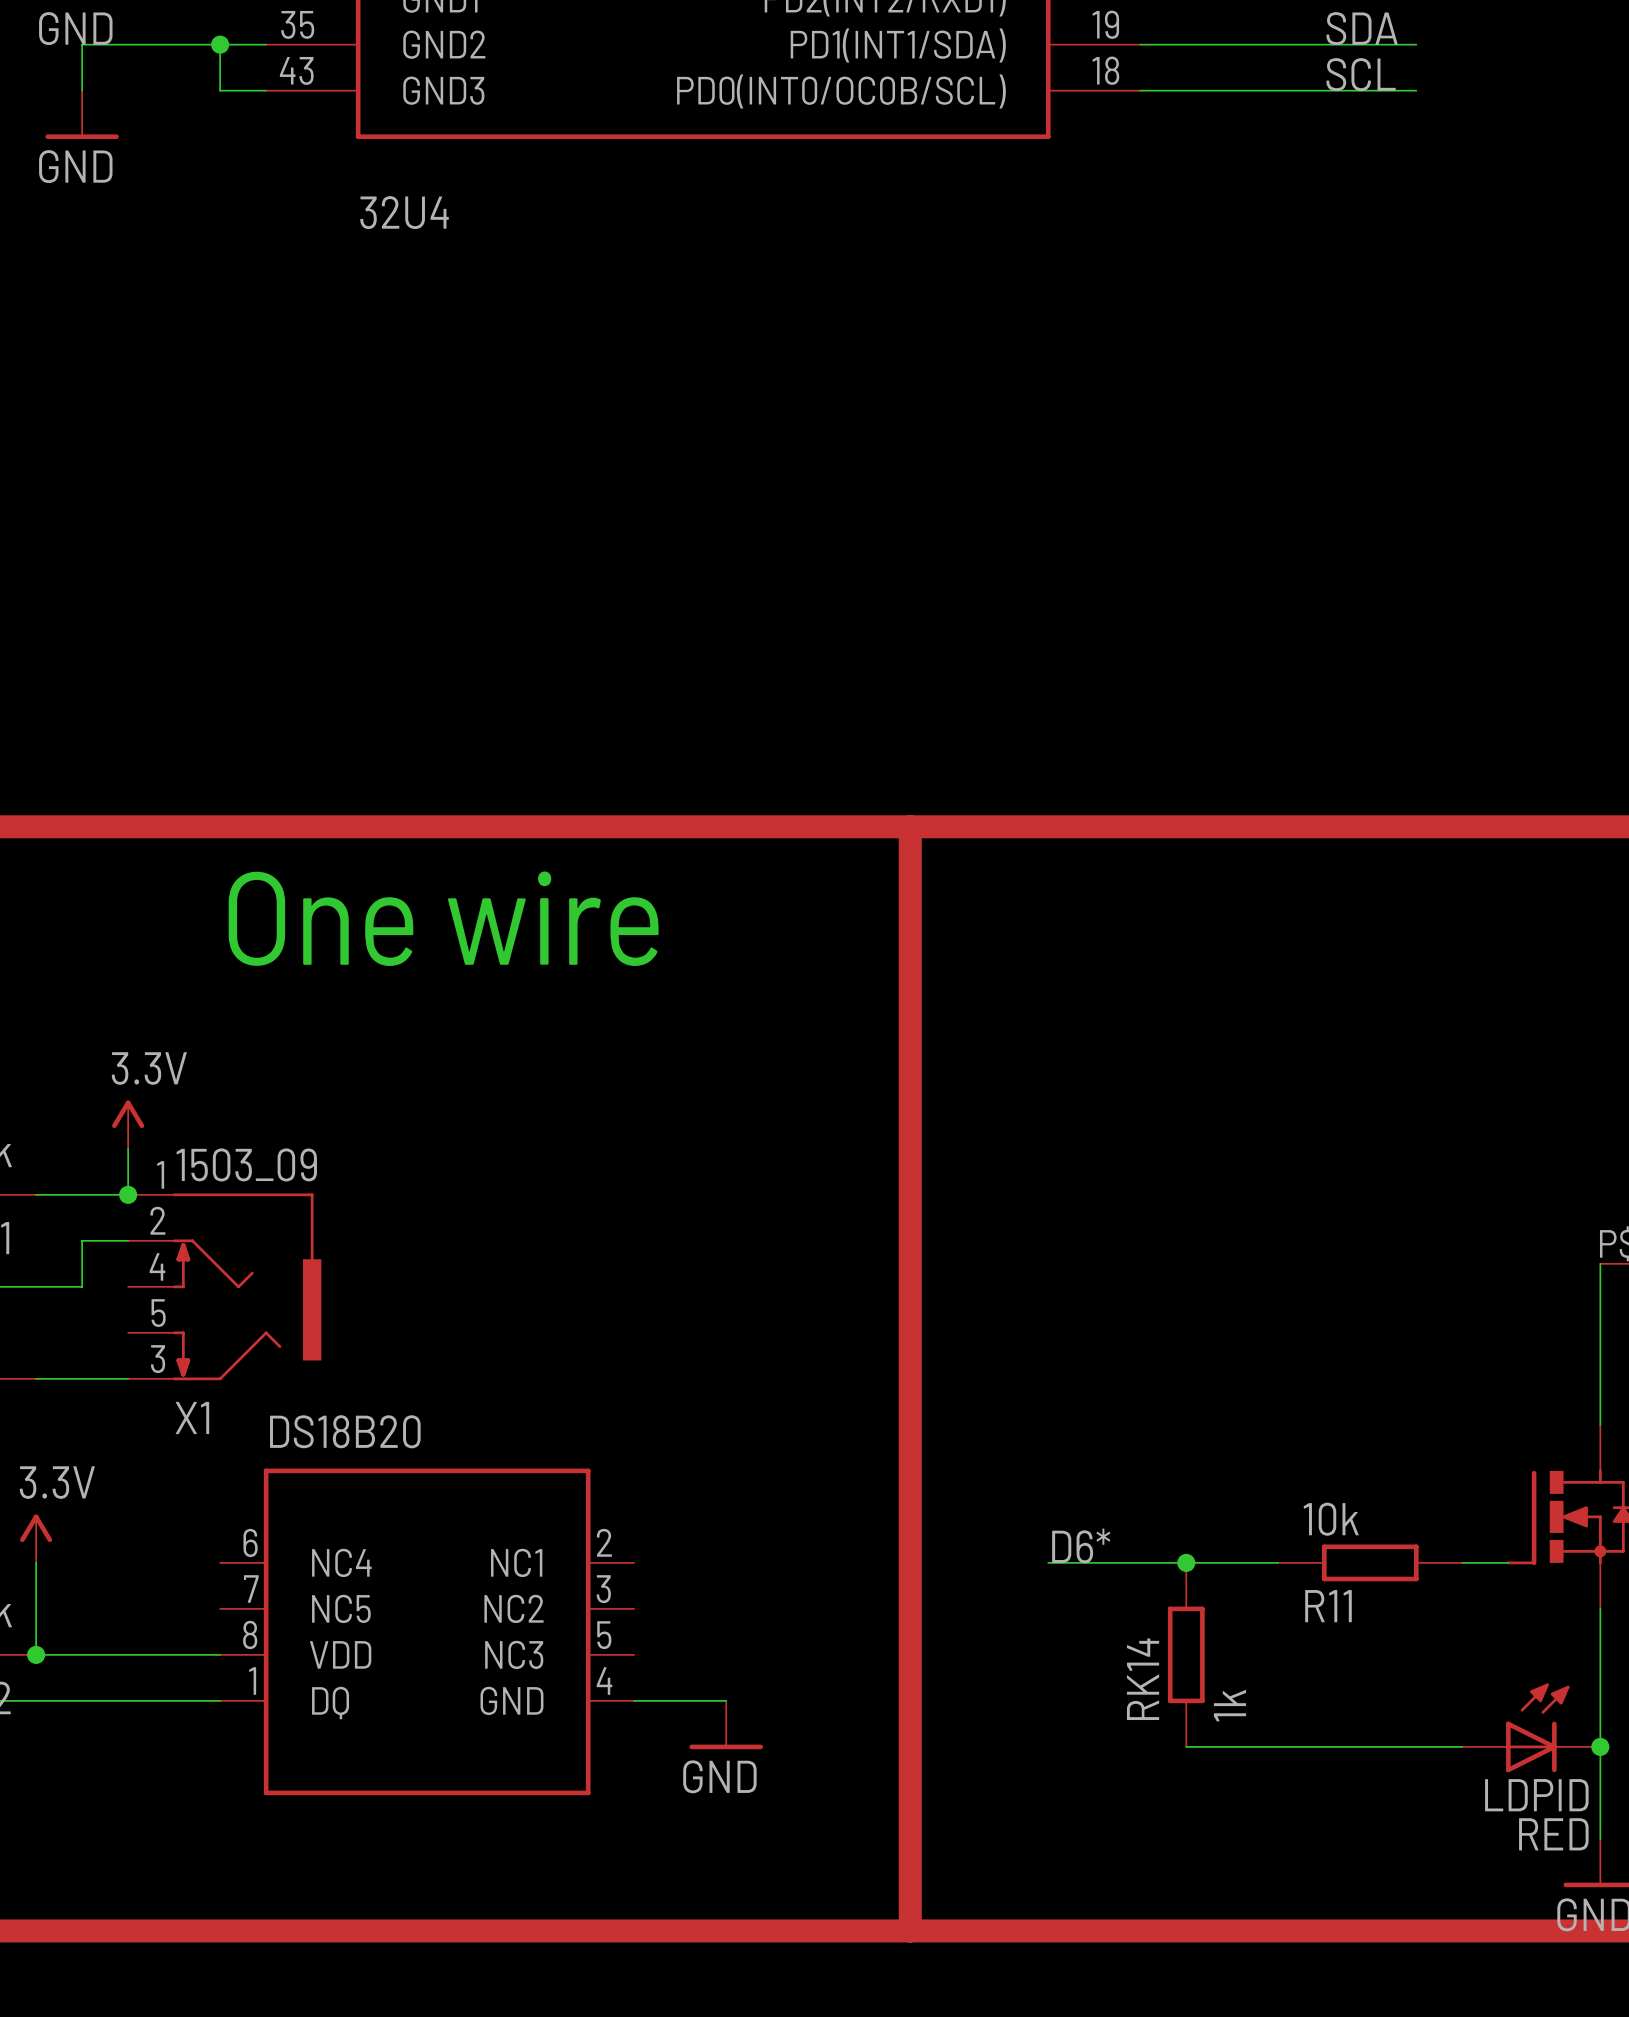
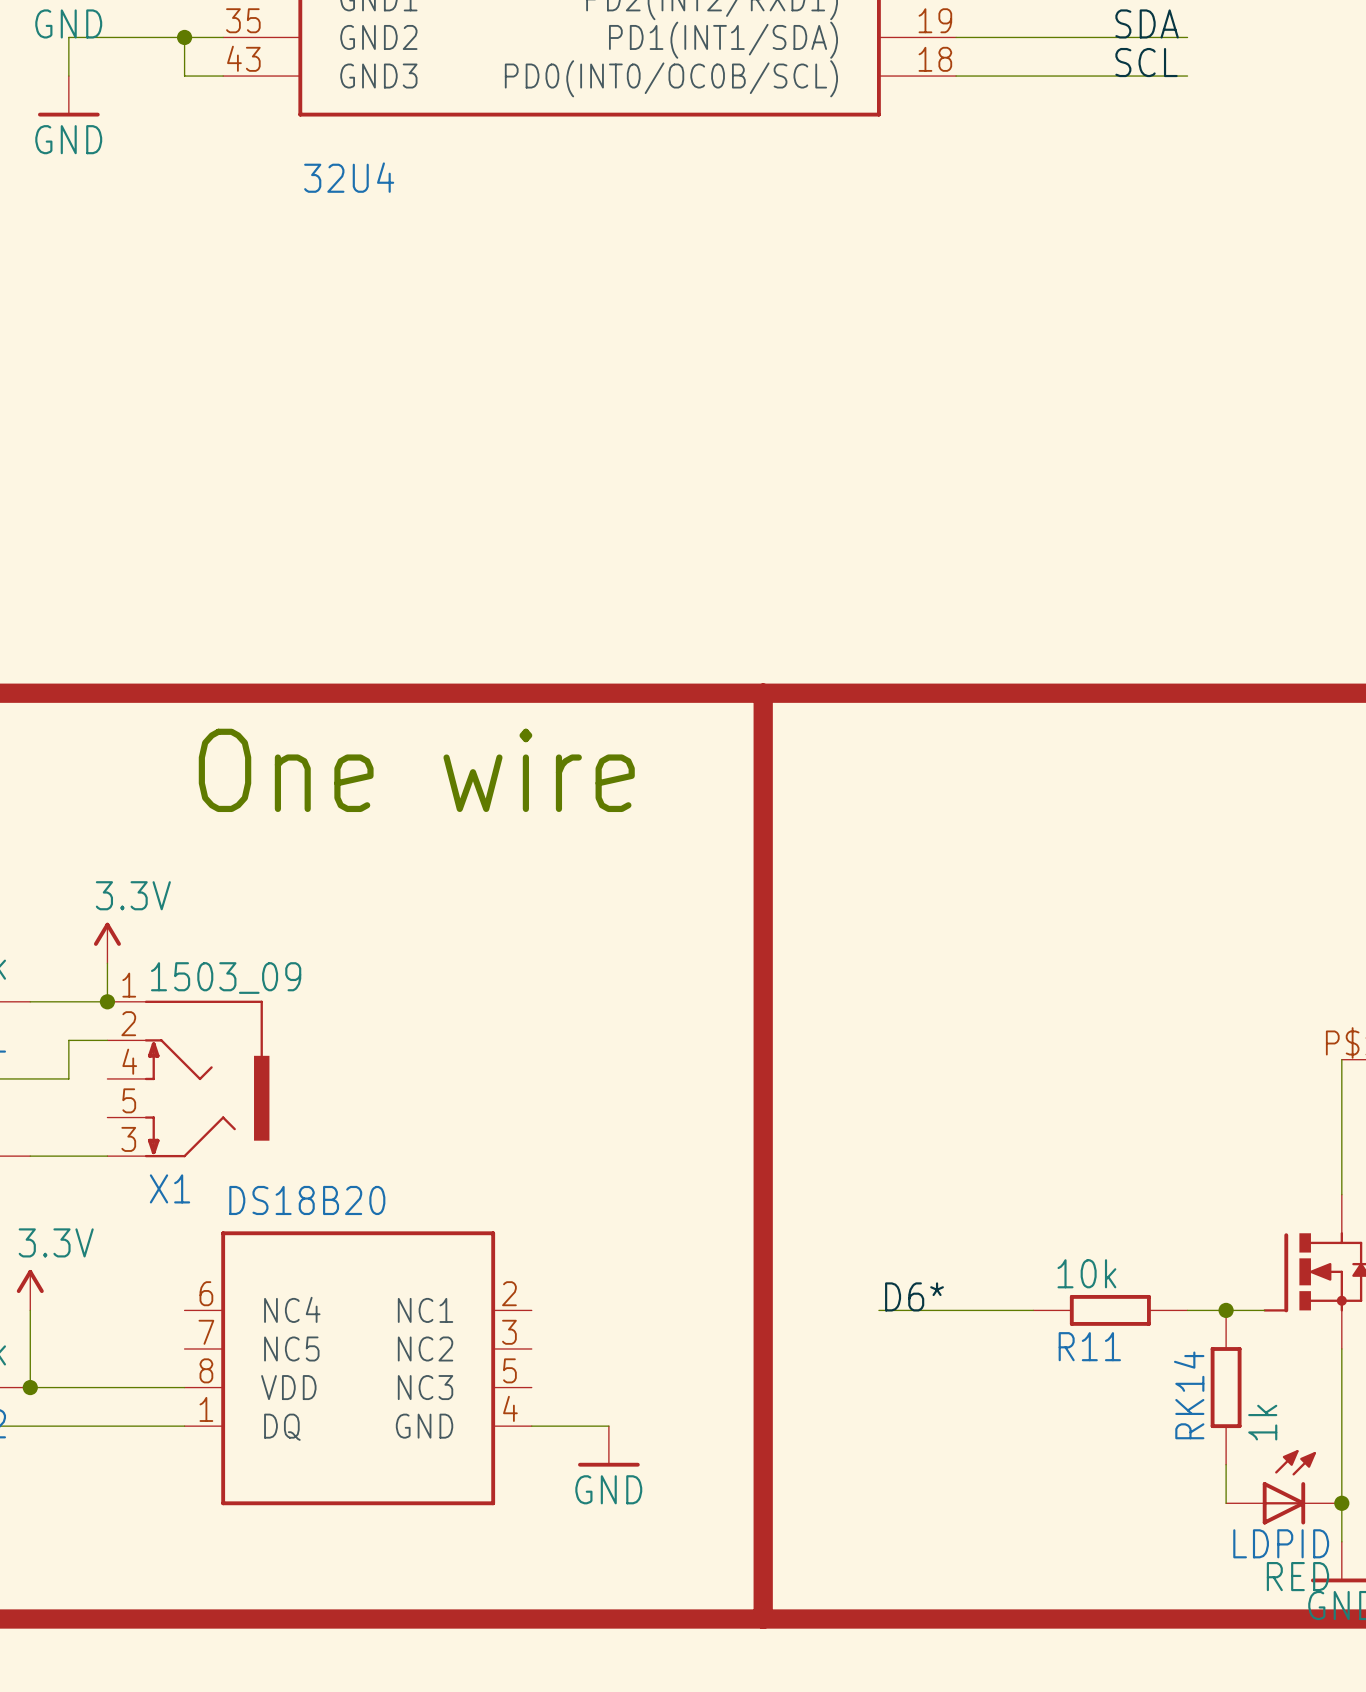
junction: (1186, 1562) -> none
R11 position: (1370, 1562) -> (1110, 1310)
junction: none -> (1226, 1310)
RK14 position: (1186, 1654) -> (1226, 1387)
LDPID position: (1531, 1727) -> (1283, 1487)
wire: (1186, 1746) (1462, 1746) -> (1226, 1503) (1226, 1464)
junction position: (1600, 1746) -> (1341, 1503)

